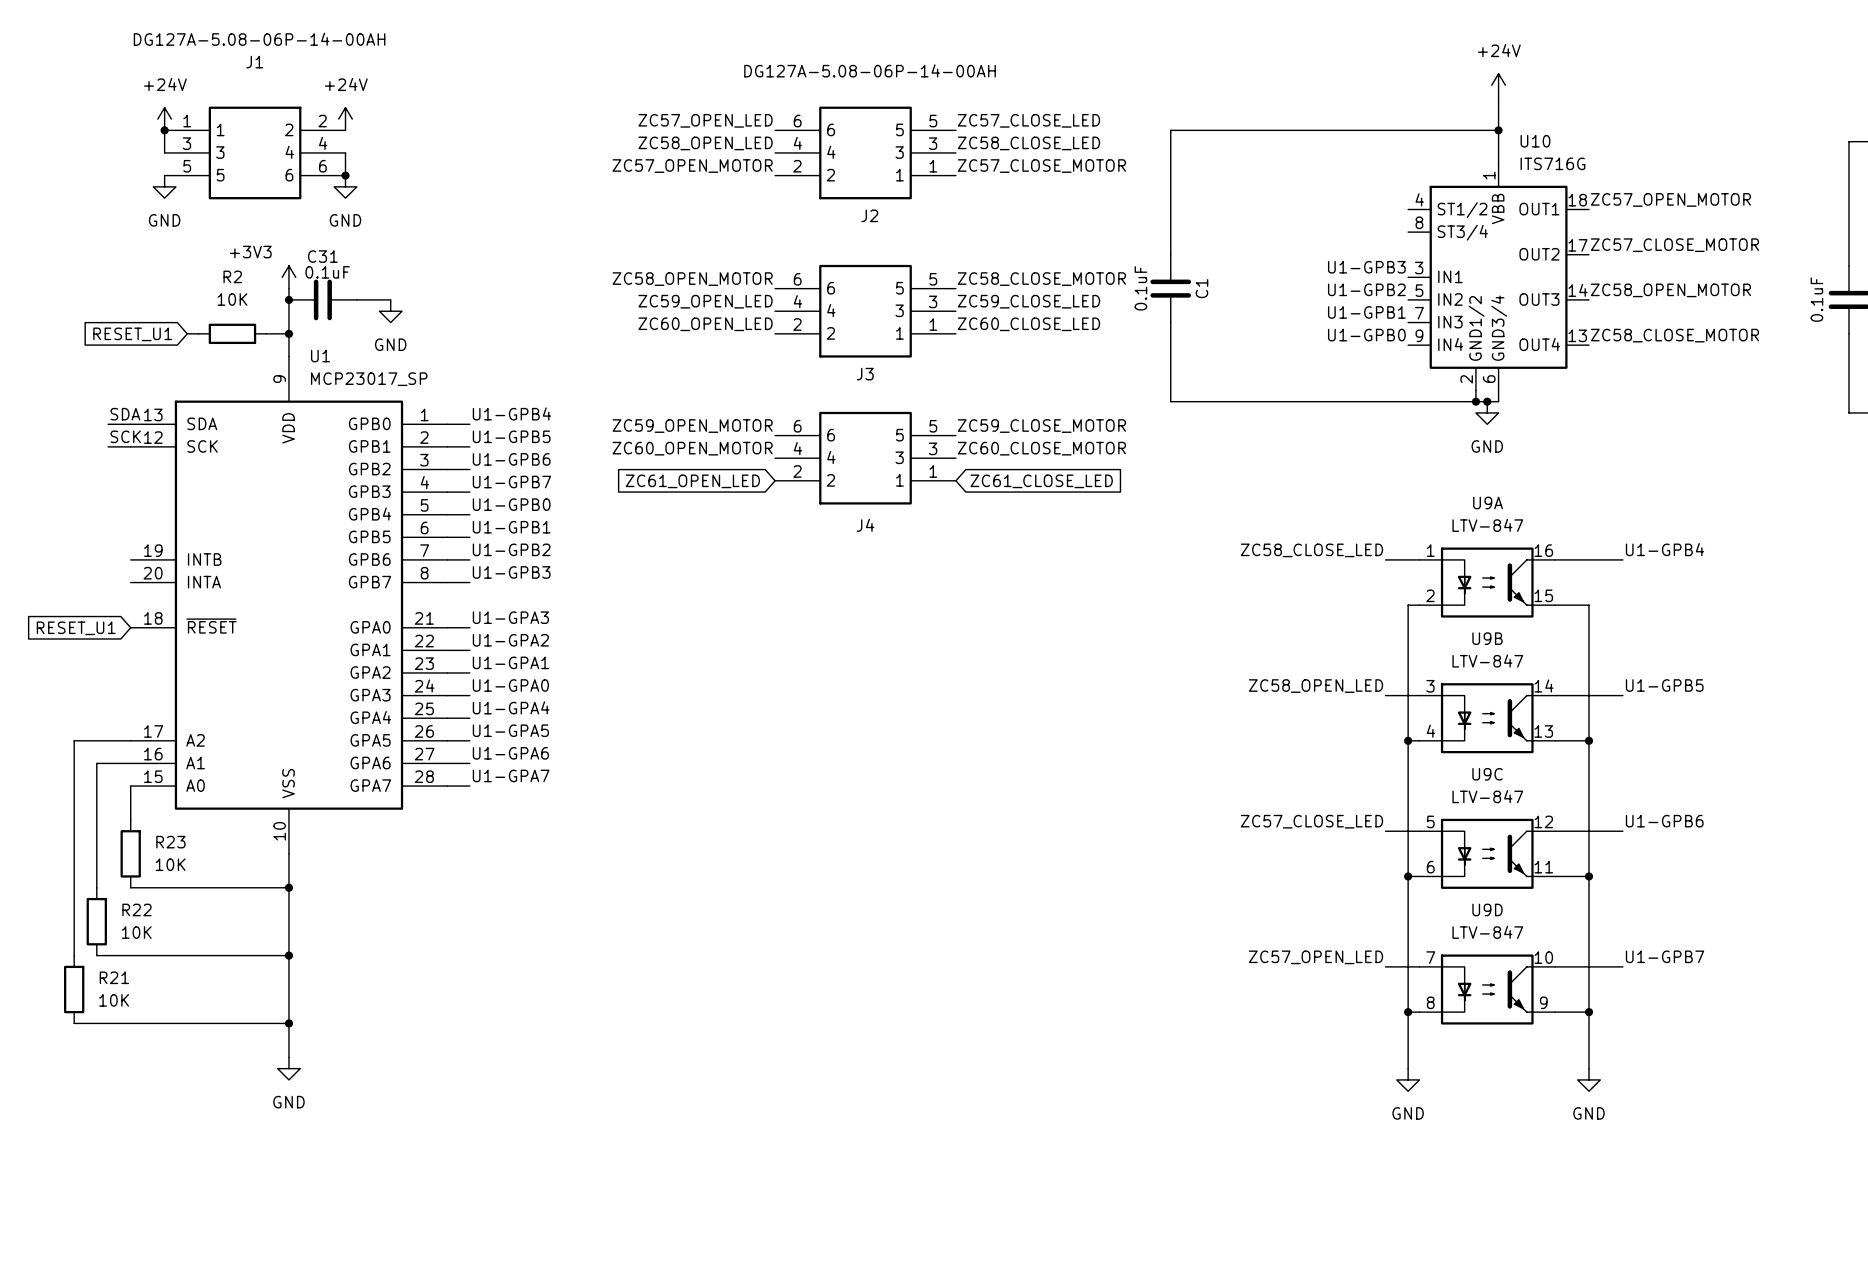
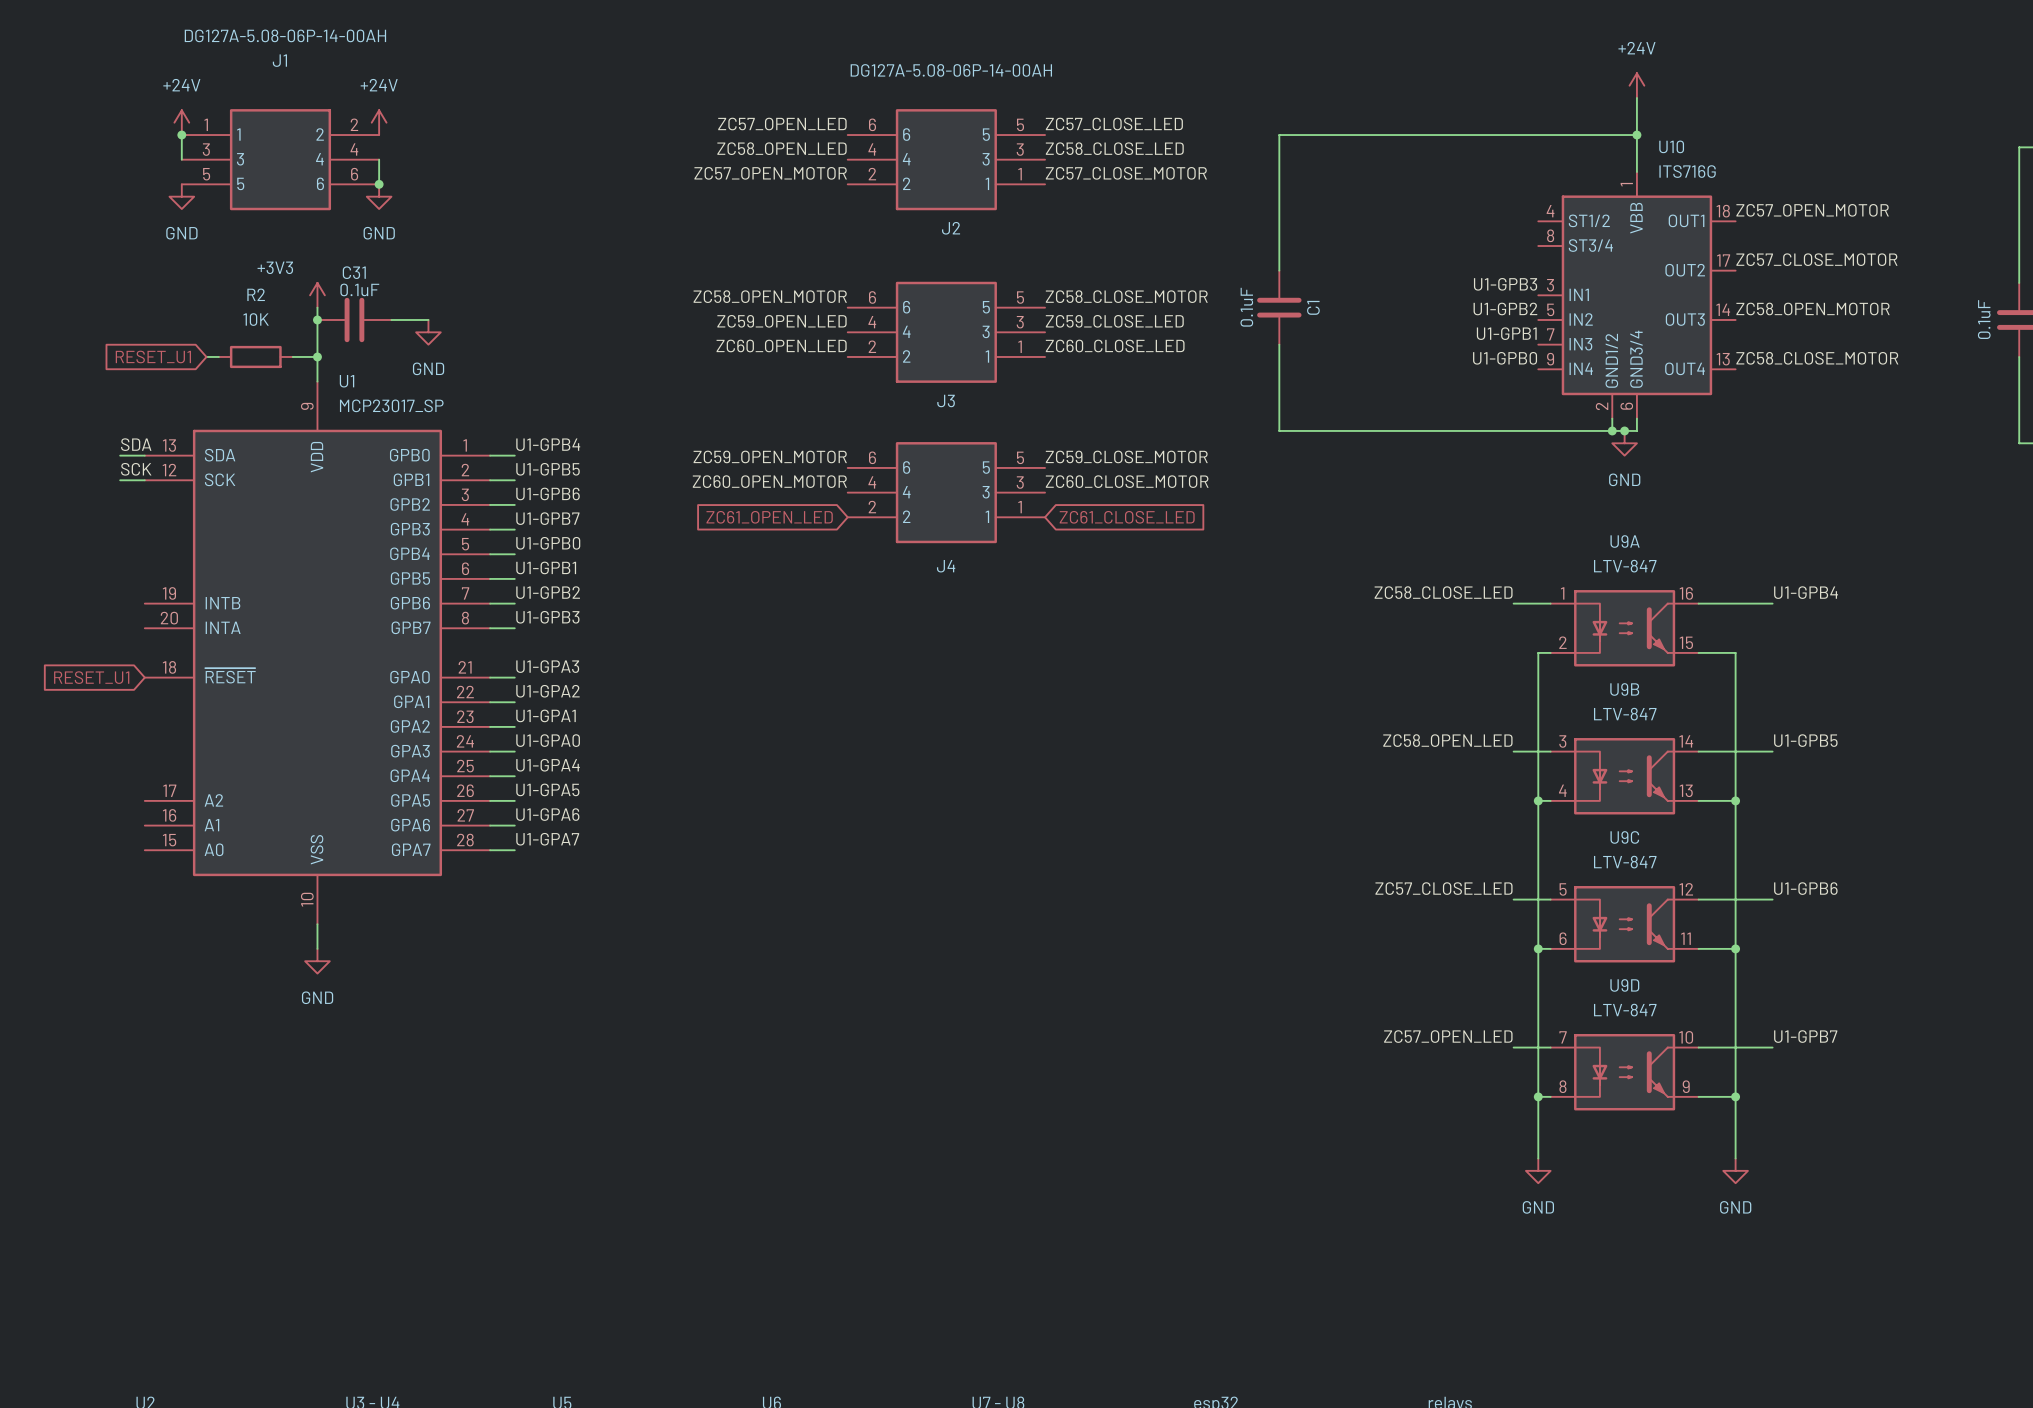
wire: (130, 740) (74, 740) (74, 955) -> none
wire: (130, 763) (96, 763) (96, 887) -> none
wire: (130, 786) (130, 819) -> none
R23: 10K (130, 853) -> none
wire: (288, 876) (288, 1057) -> none
wire: (130, 887) (288, 887) -> none
junction: (288, 887) -> none
R22: 10K (96, 921) -> none
wire: (96, 955) (288, 955) -> none
junction: (288, 955) -> none
R21: 10K (74, 989) -> none
wire: (74, 1023) (288, 1023) -> none
junction: (288, 1023) -> none
power symbol position: GND (288, 1068) -> GND (317, 961)

